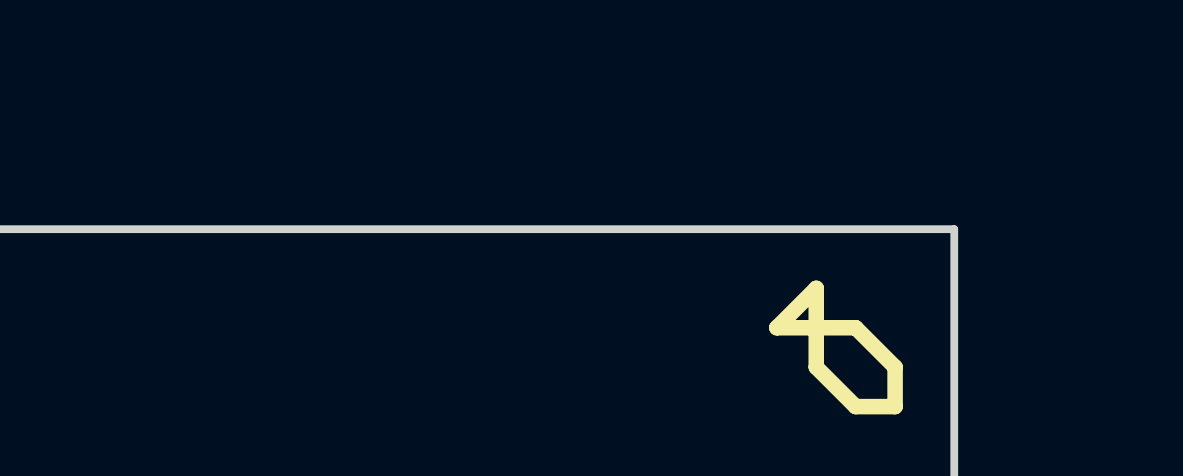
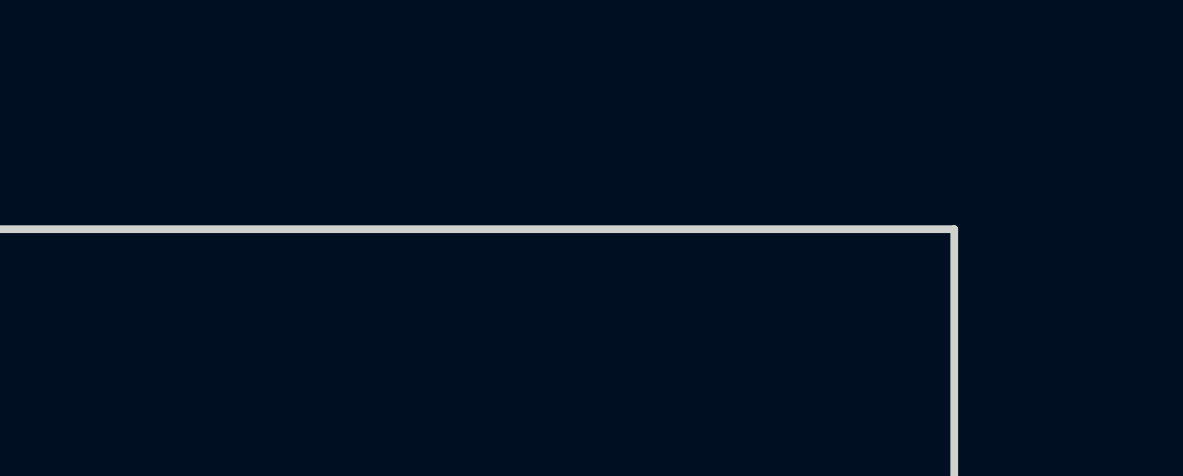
line: (816, 288) (776, 327) (855, 327) (895, 367) (895, 406) (855, 406) (816, 367) (816, 288) -> none

